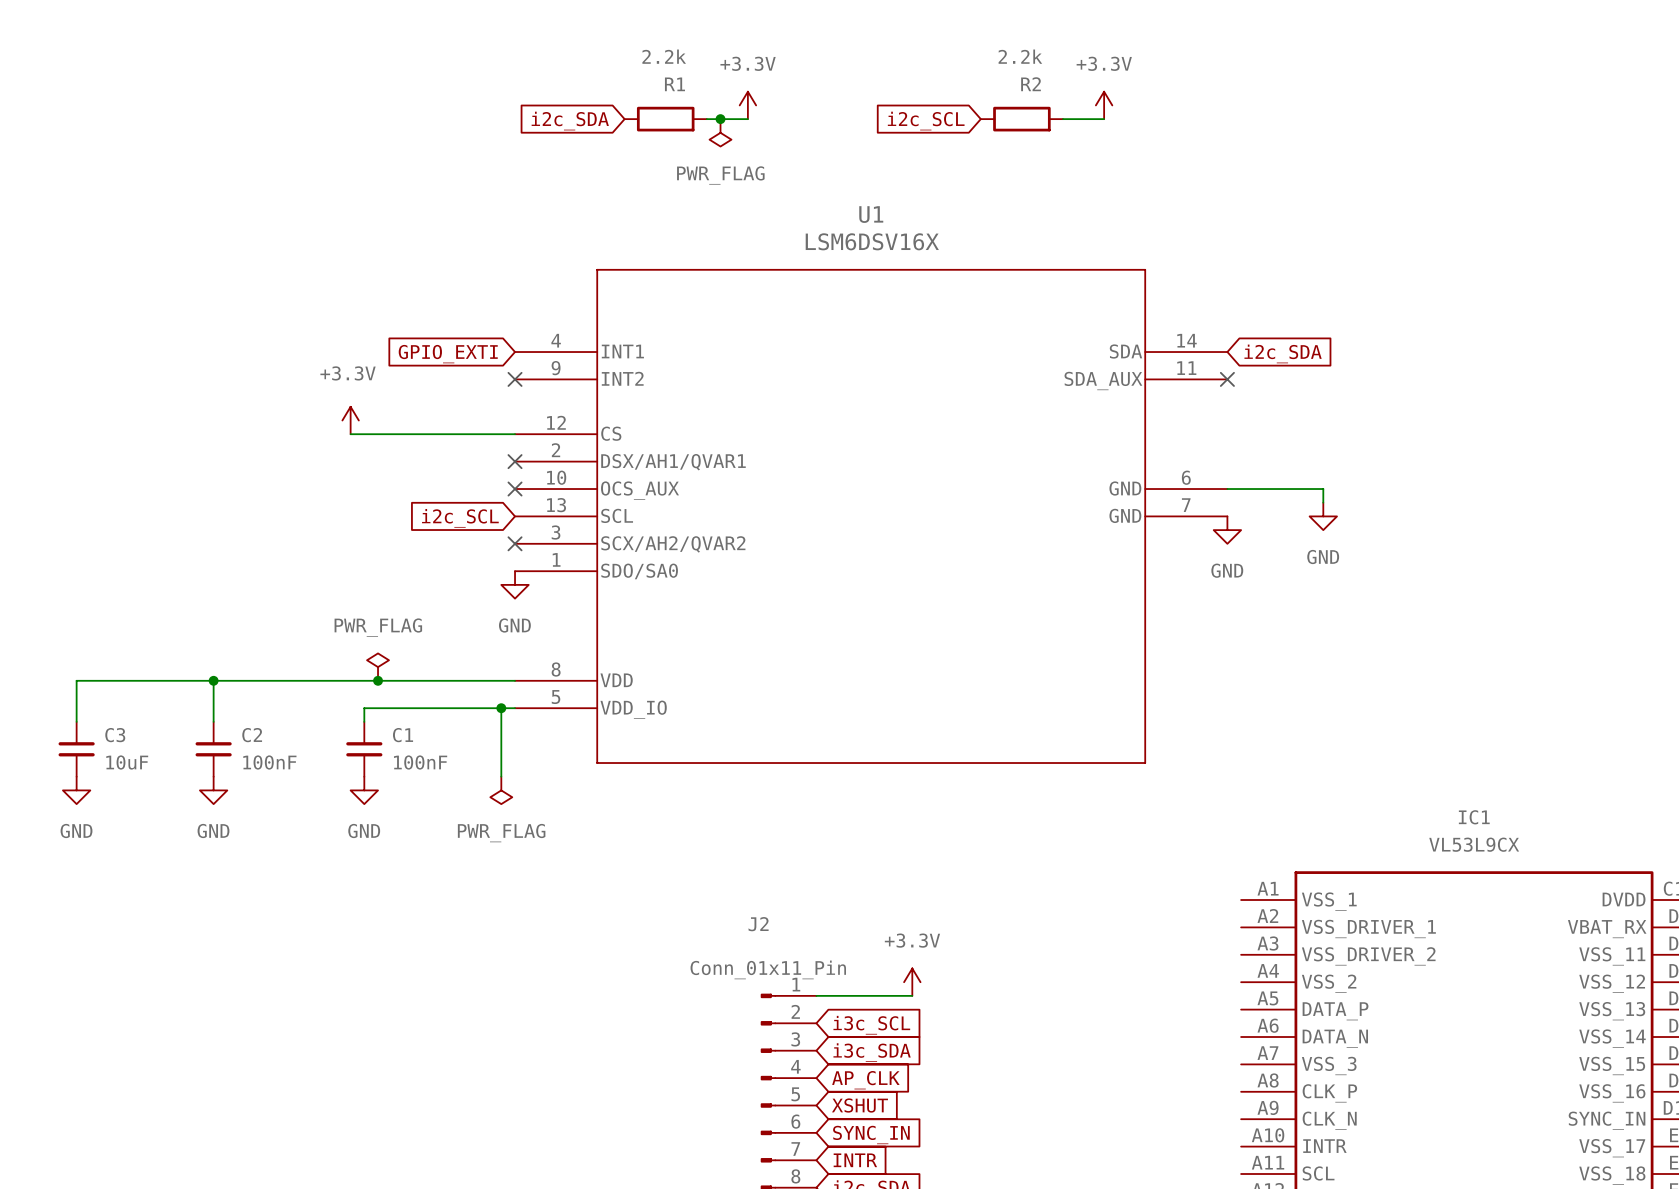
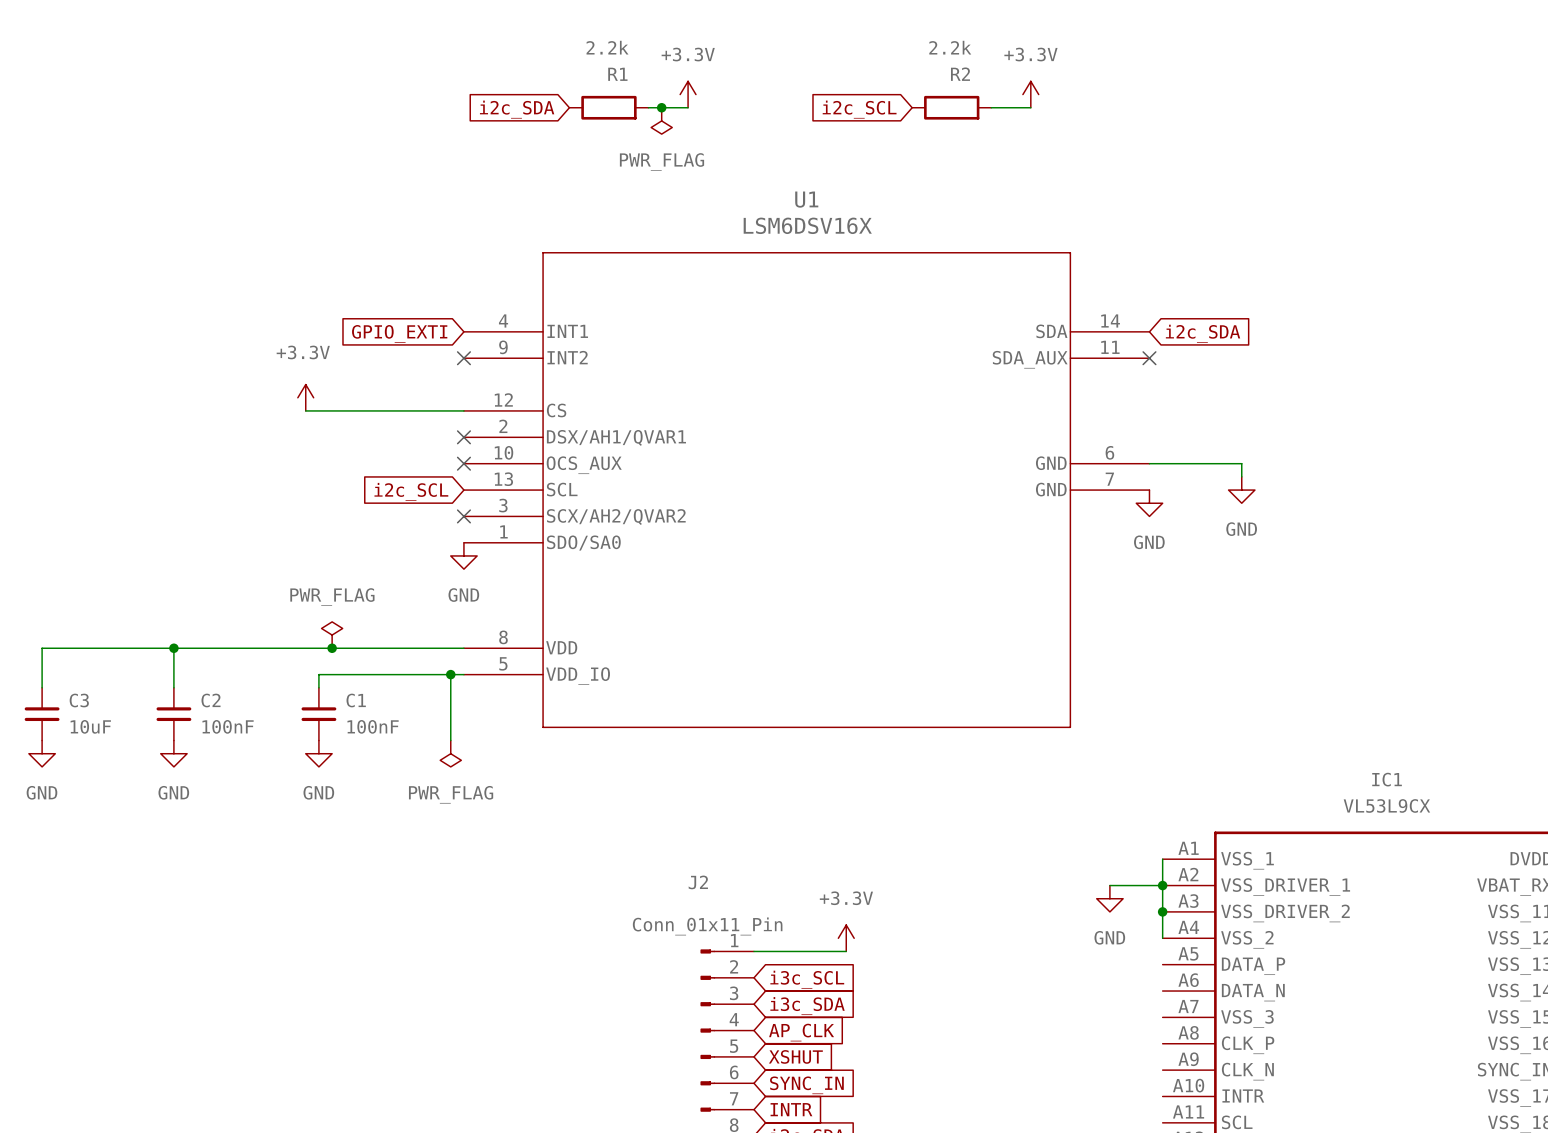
wire: none -> (1162, 859) (1162, 938)
wire: none -> (1109, 885) (1162, 885)
junction: none -> (1162, 885)
power symbol: none -> GND (1109, 898)
junction: none -> (1162, 911)

